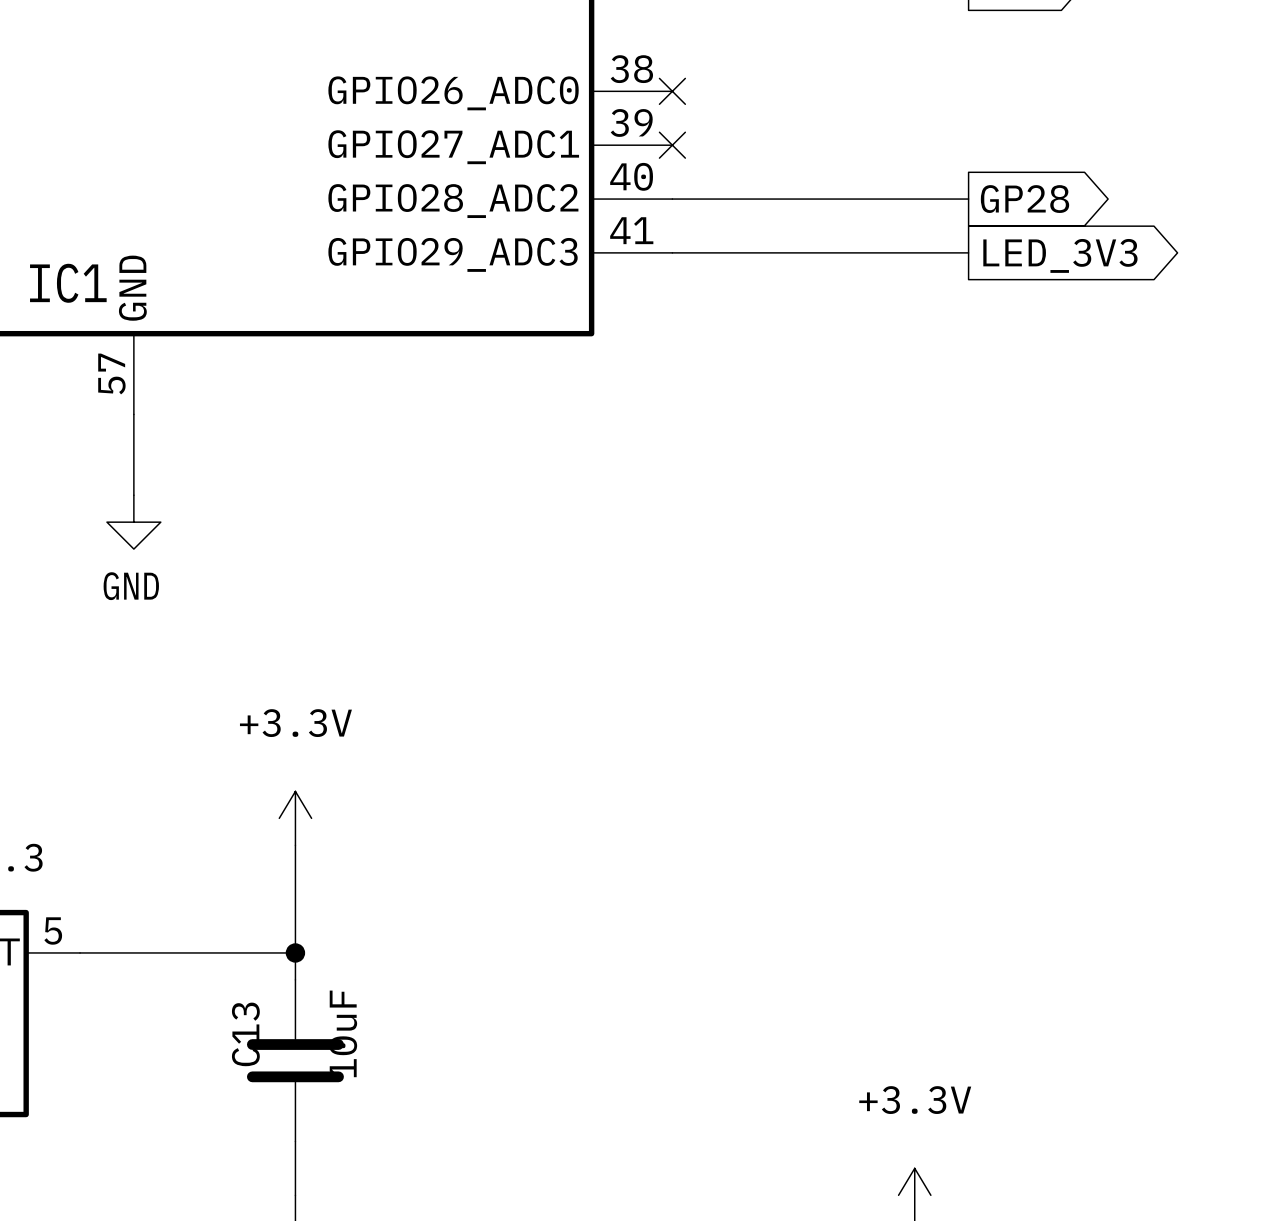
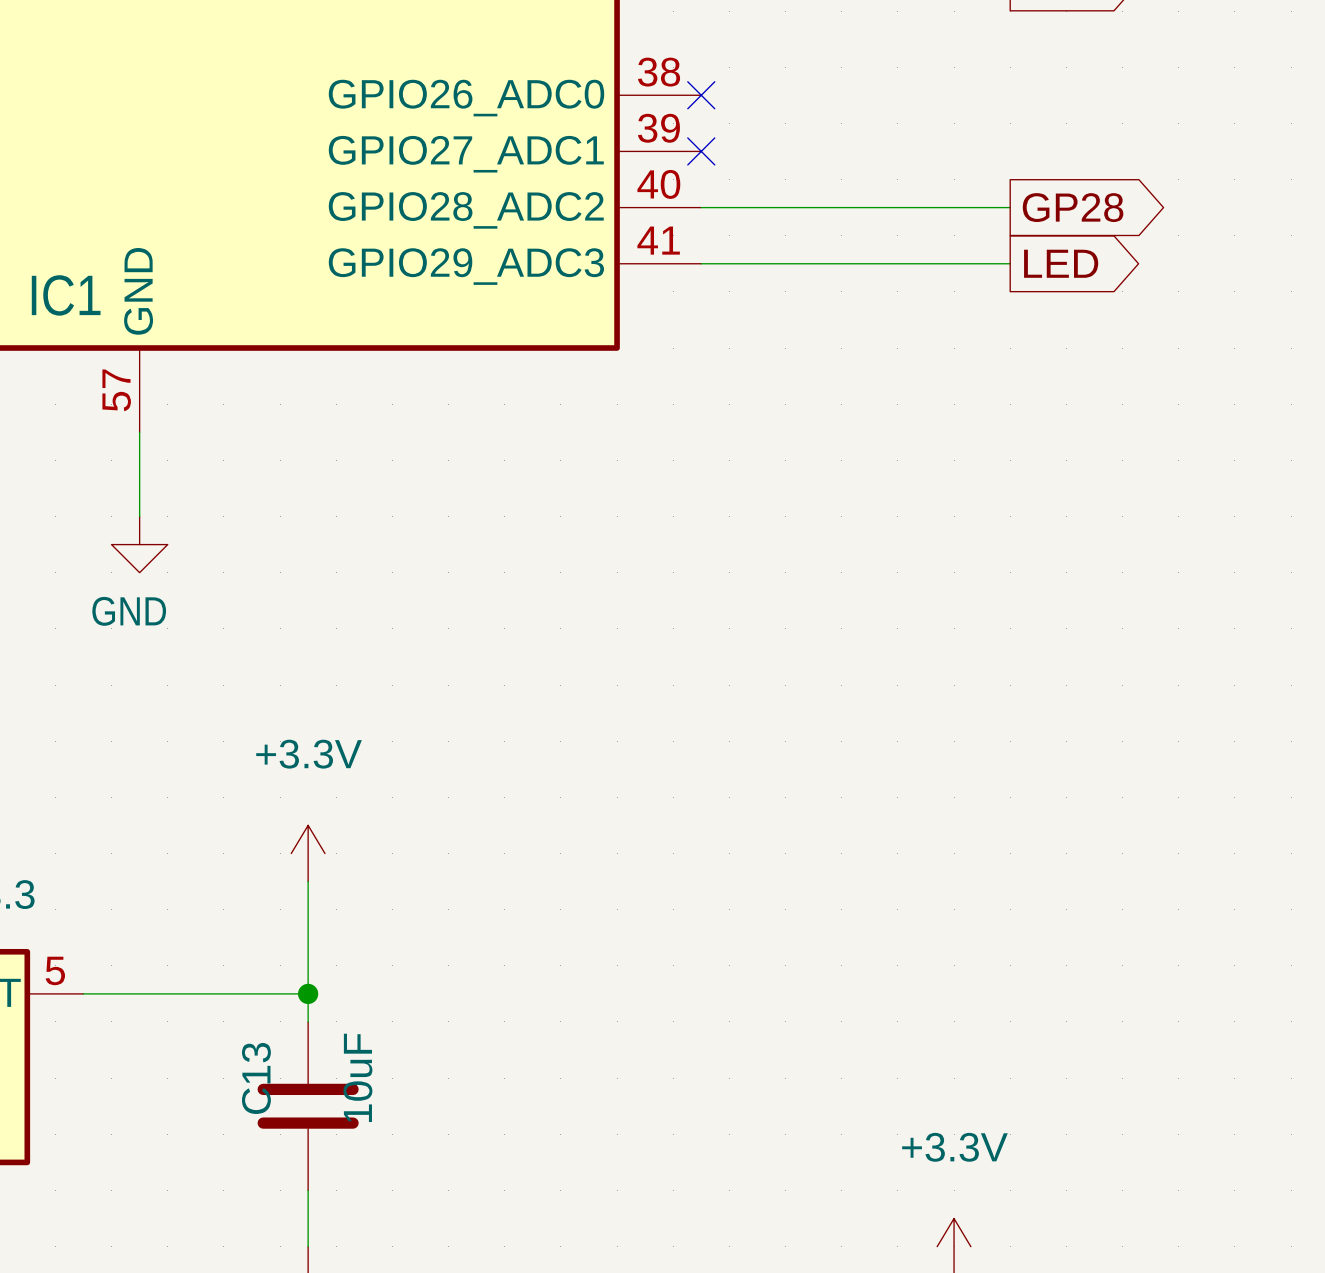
global label: LED_3V3 (1060, 255) -> LED (1061, 263)

